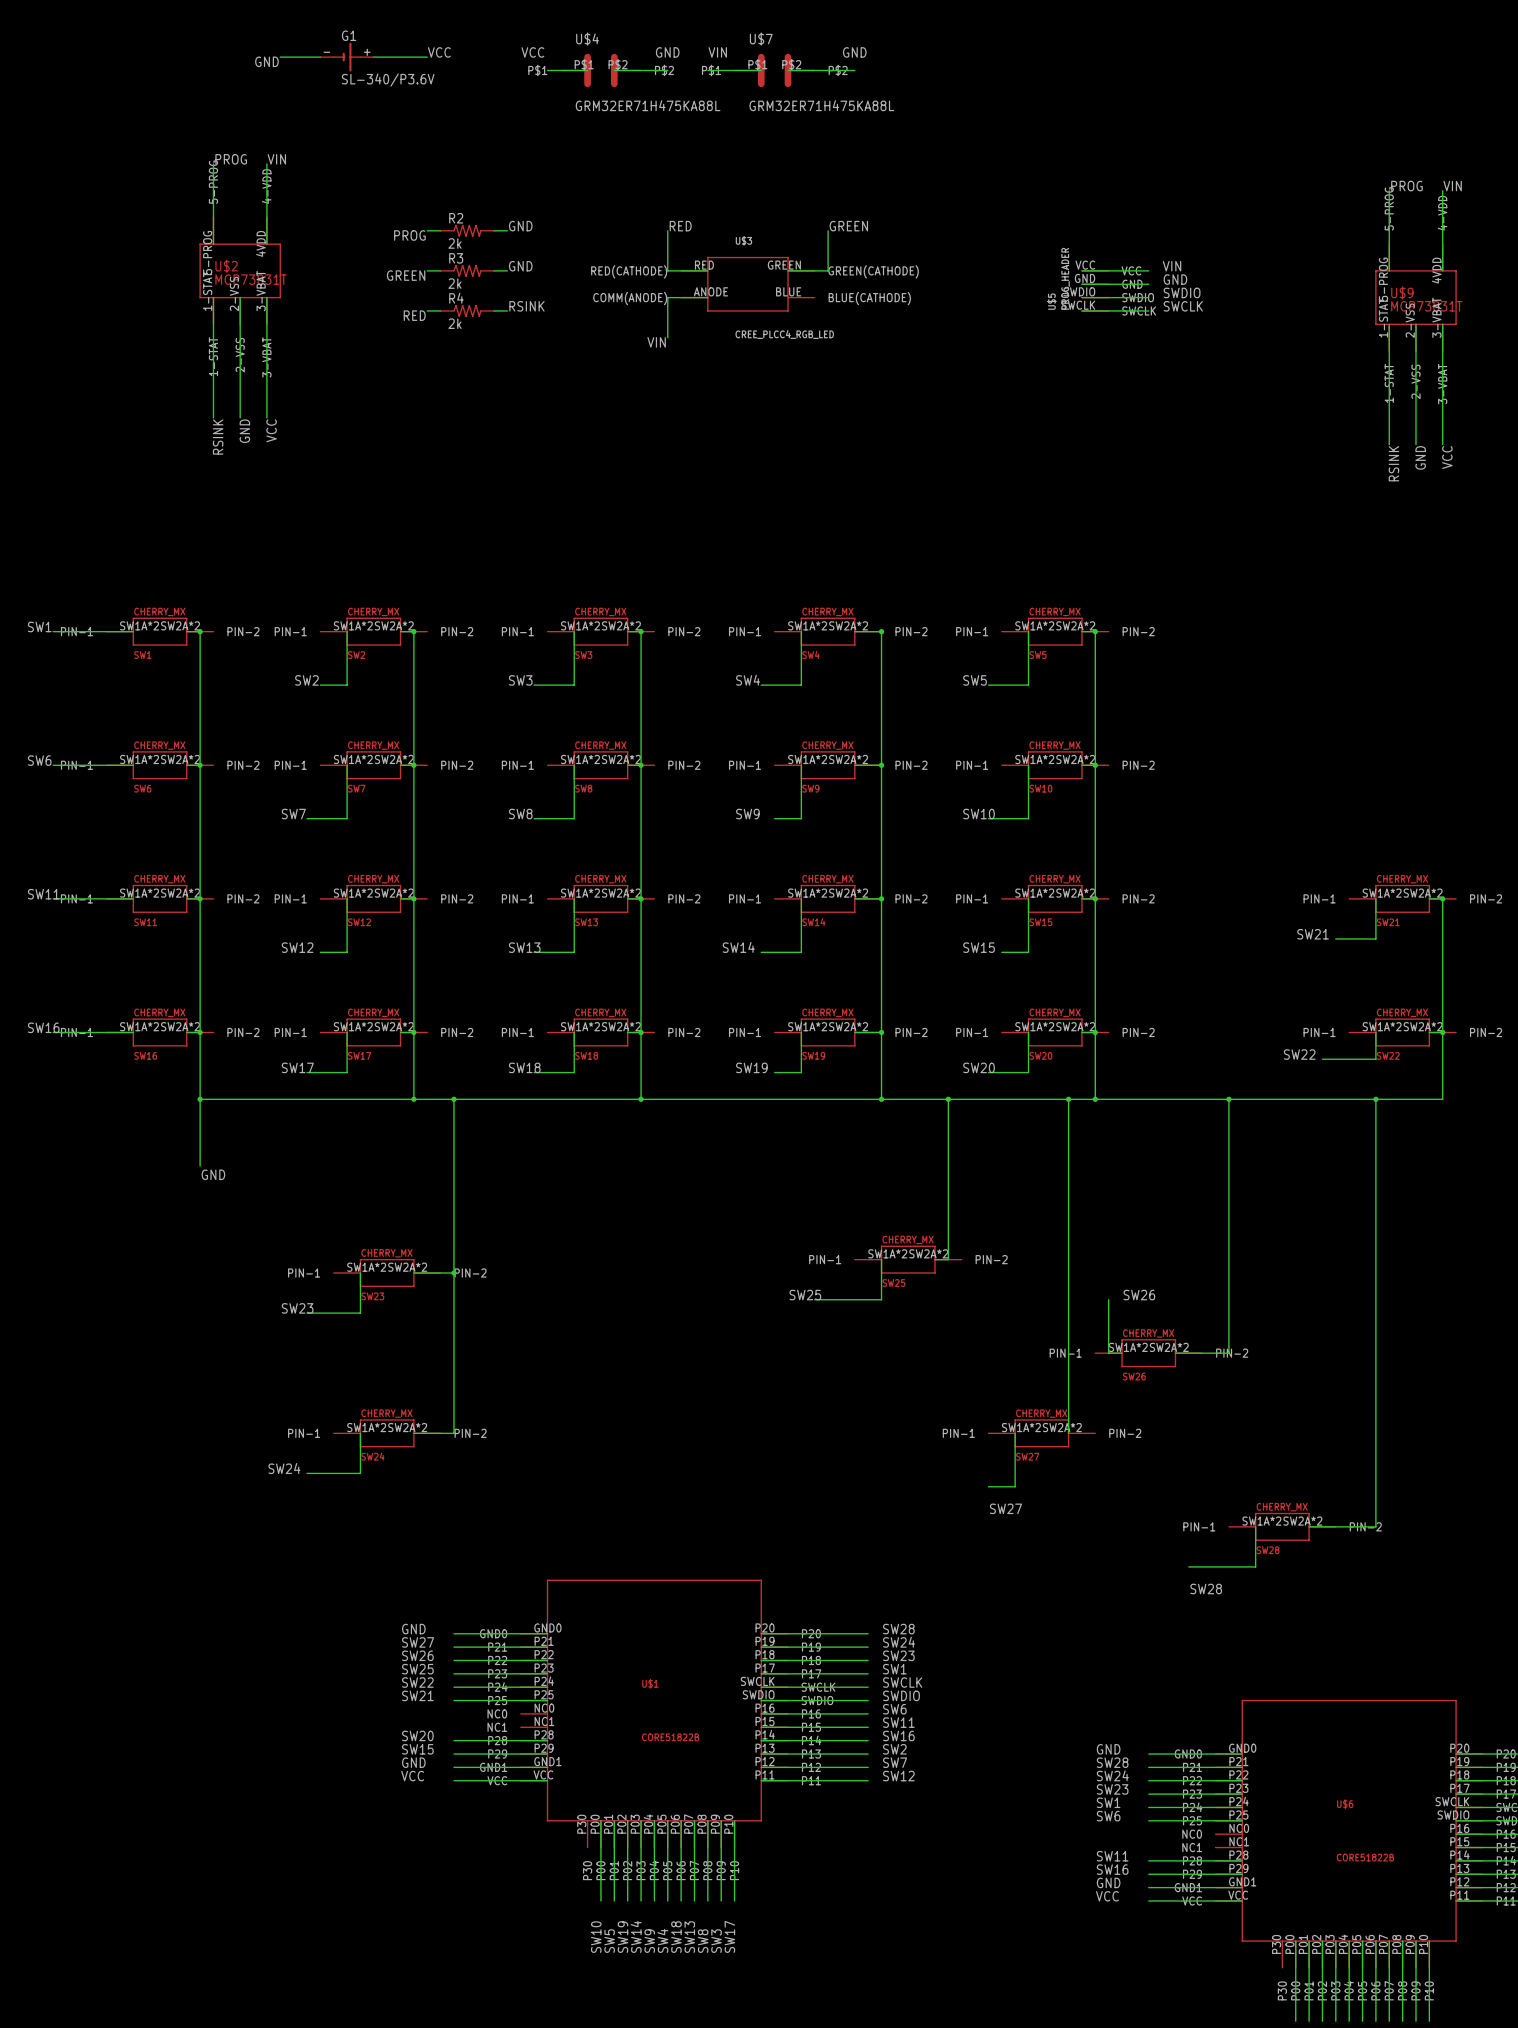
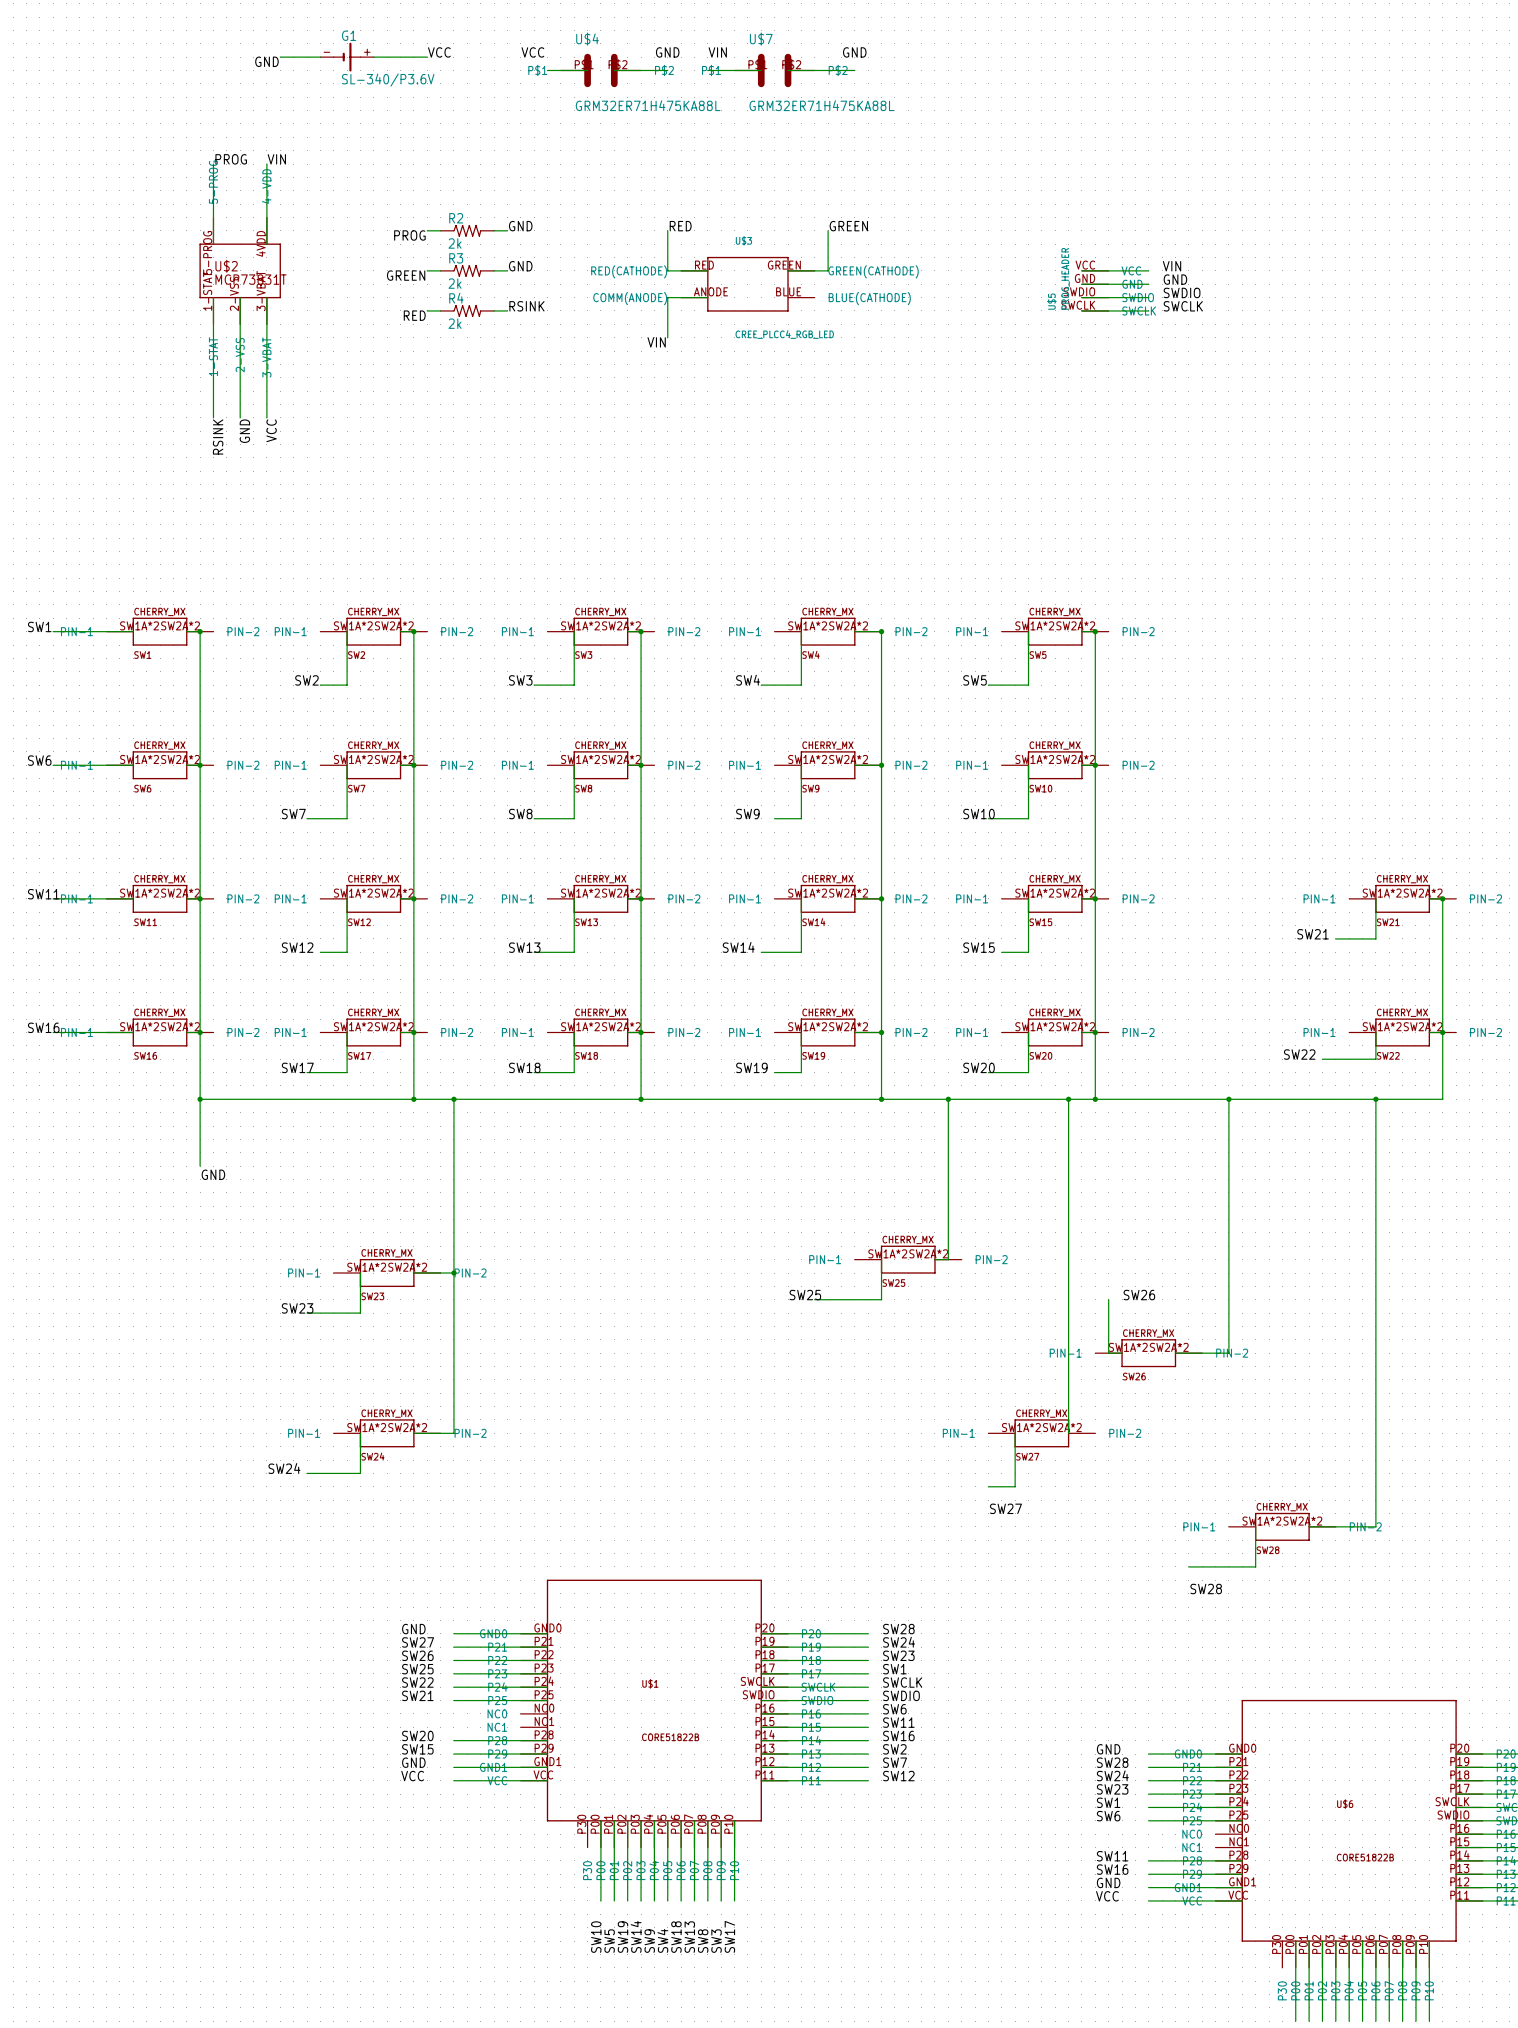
label: PROG (1406, 186) -> none
label: VIN (1452, 186) -> none
wire: (1389, 190) (1389, 270) -> none
wire: (1442, 190) (1442, 270) -> none
U$9: MCP73831T (1415, 297) -> none
wire: (1389, 324) (1389, 444) -> none
wire: (1415, 324) (1415, 444) -> none
wire: (1442, 324) (1442, 444) -> none
label: GND (1420, 457) -> none
label: VCC (1447, 457) -> none
label: RSINK (1393, 463) -> none

